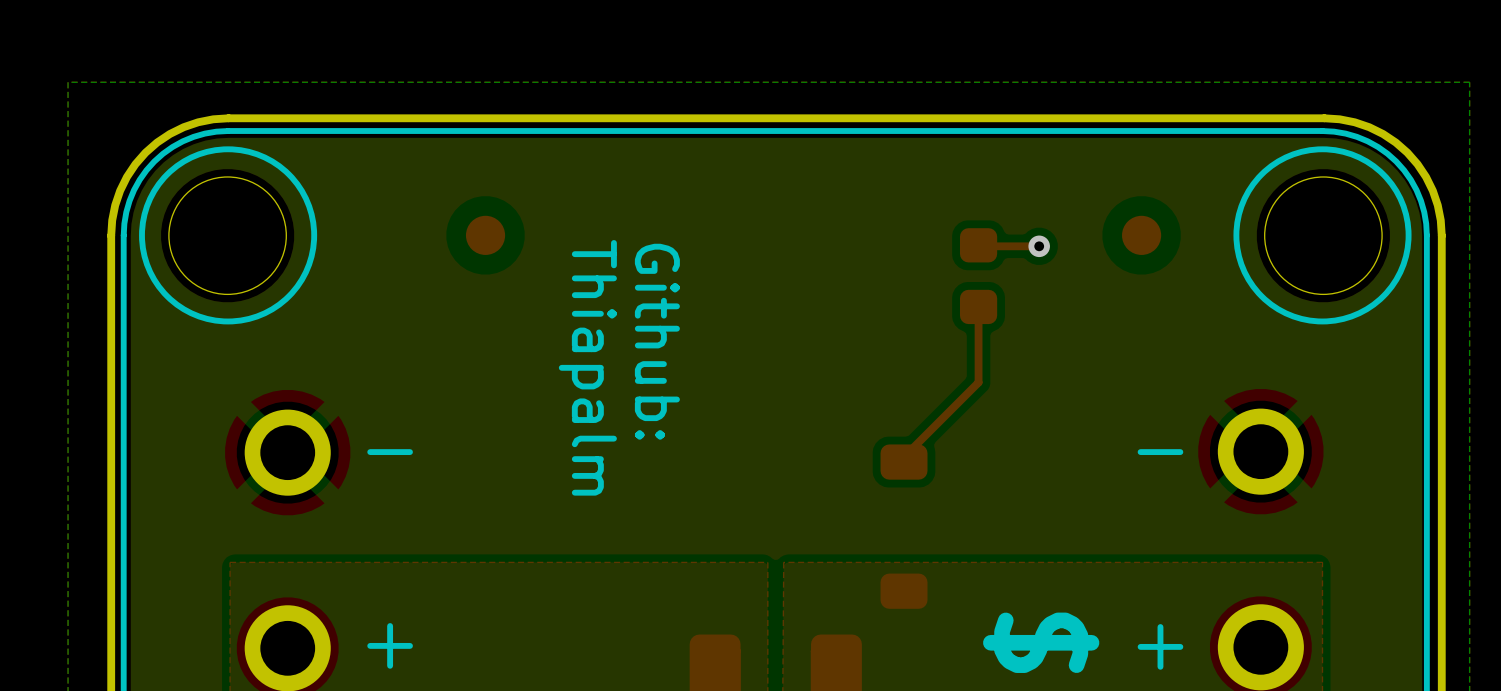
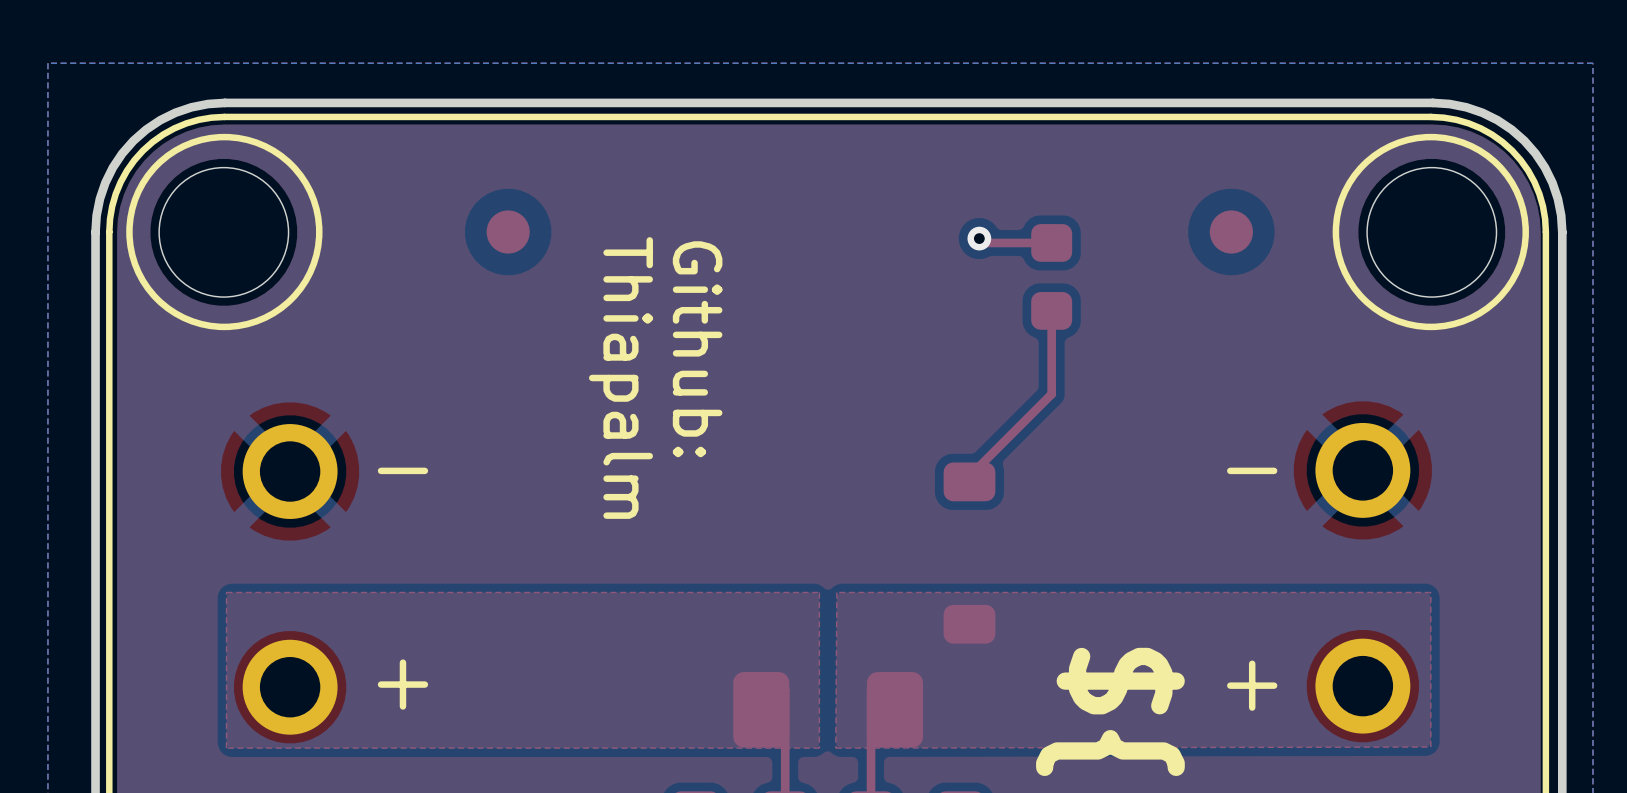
top track: (978, 245) (1039, 246) -> (1051, 242) (983, 242) (979, 238)
via position: (1039, 246) -> (979, 238)

